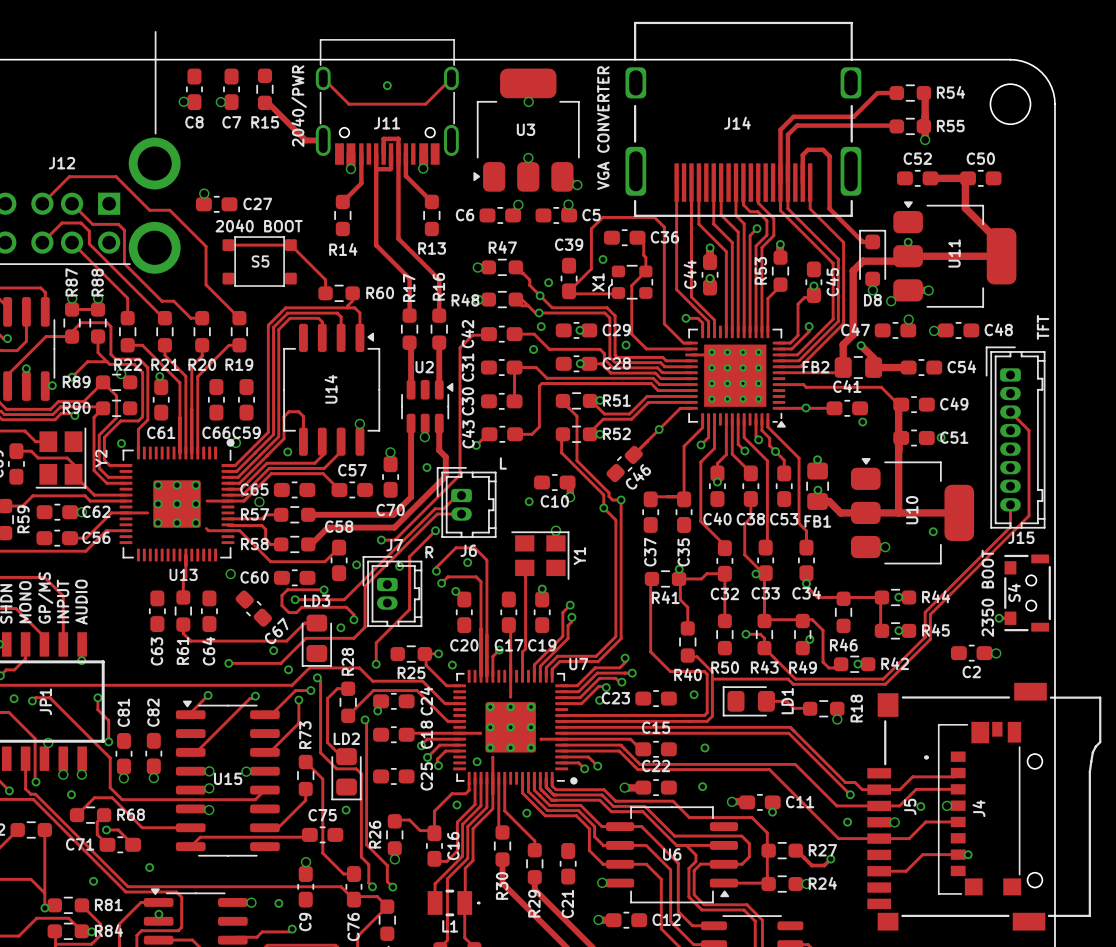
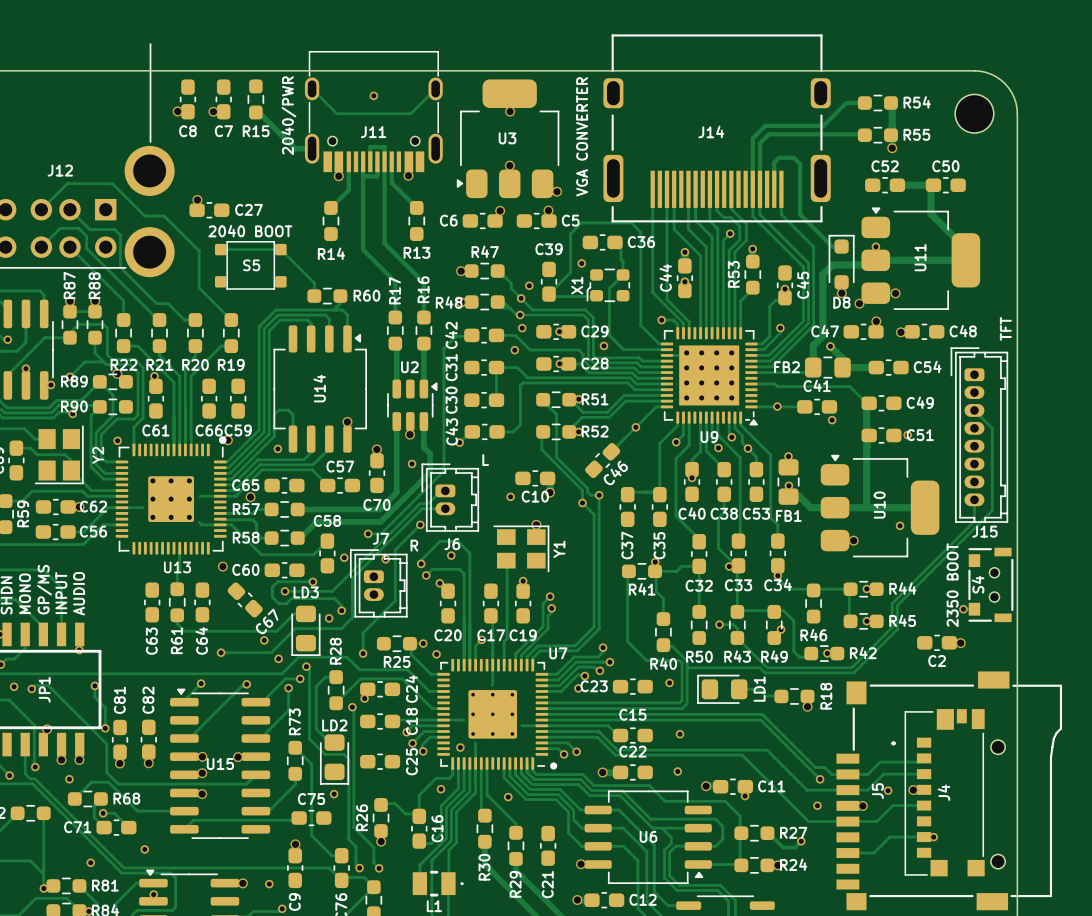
part: (735, 376) -> none
U9: none -> (709, 376)

